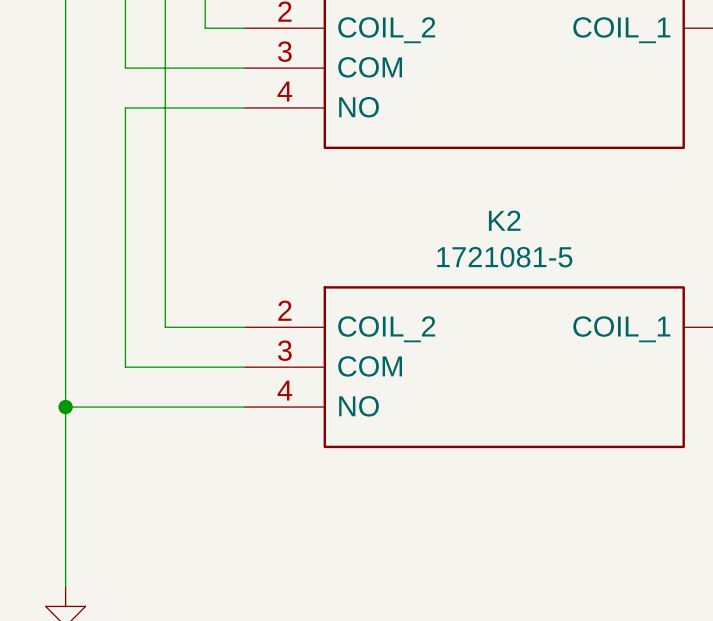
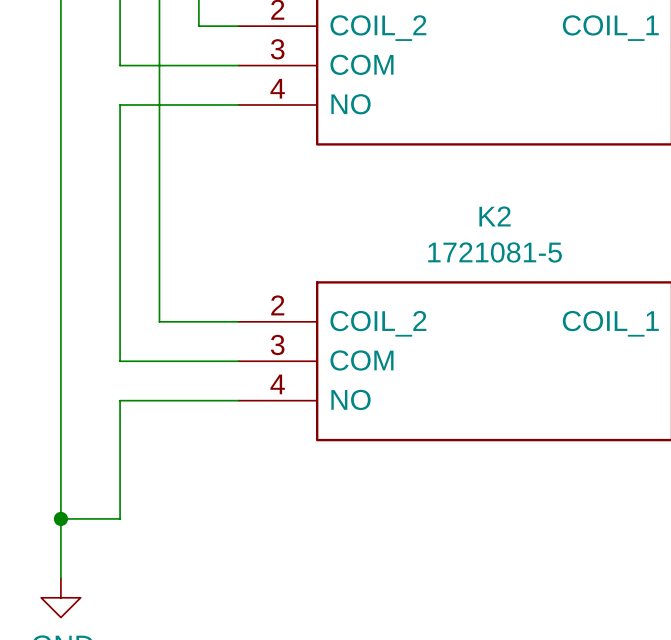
wire: (65, 407) (125, 407) -> (60, 518) (120, 518) (120, 400)
junction: (65, 407) -> none
junction: none -> (60, 518)

